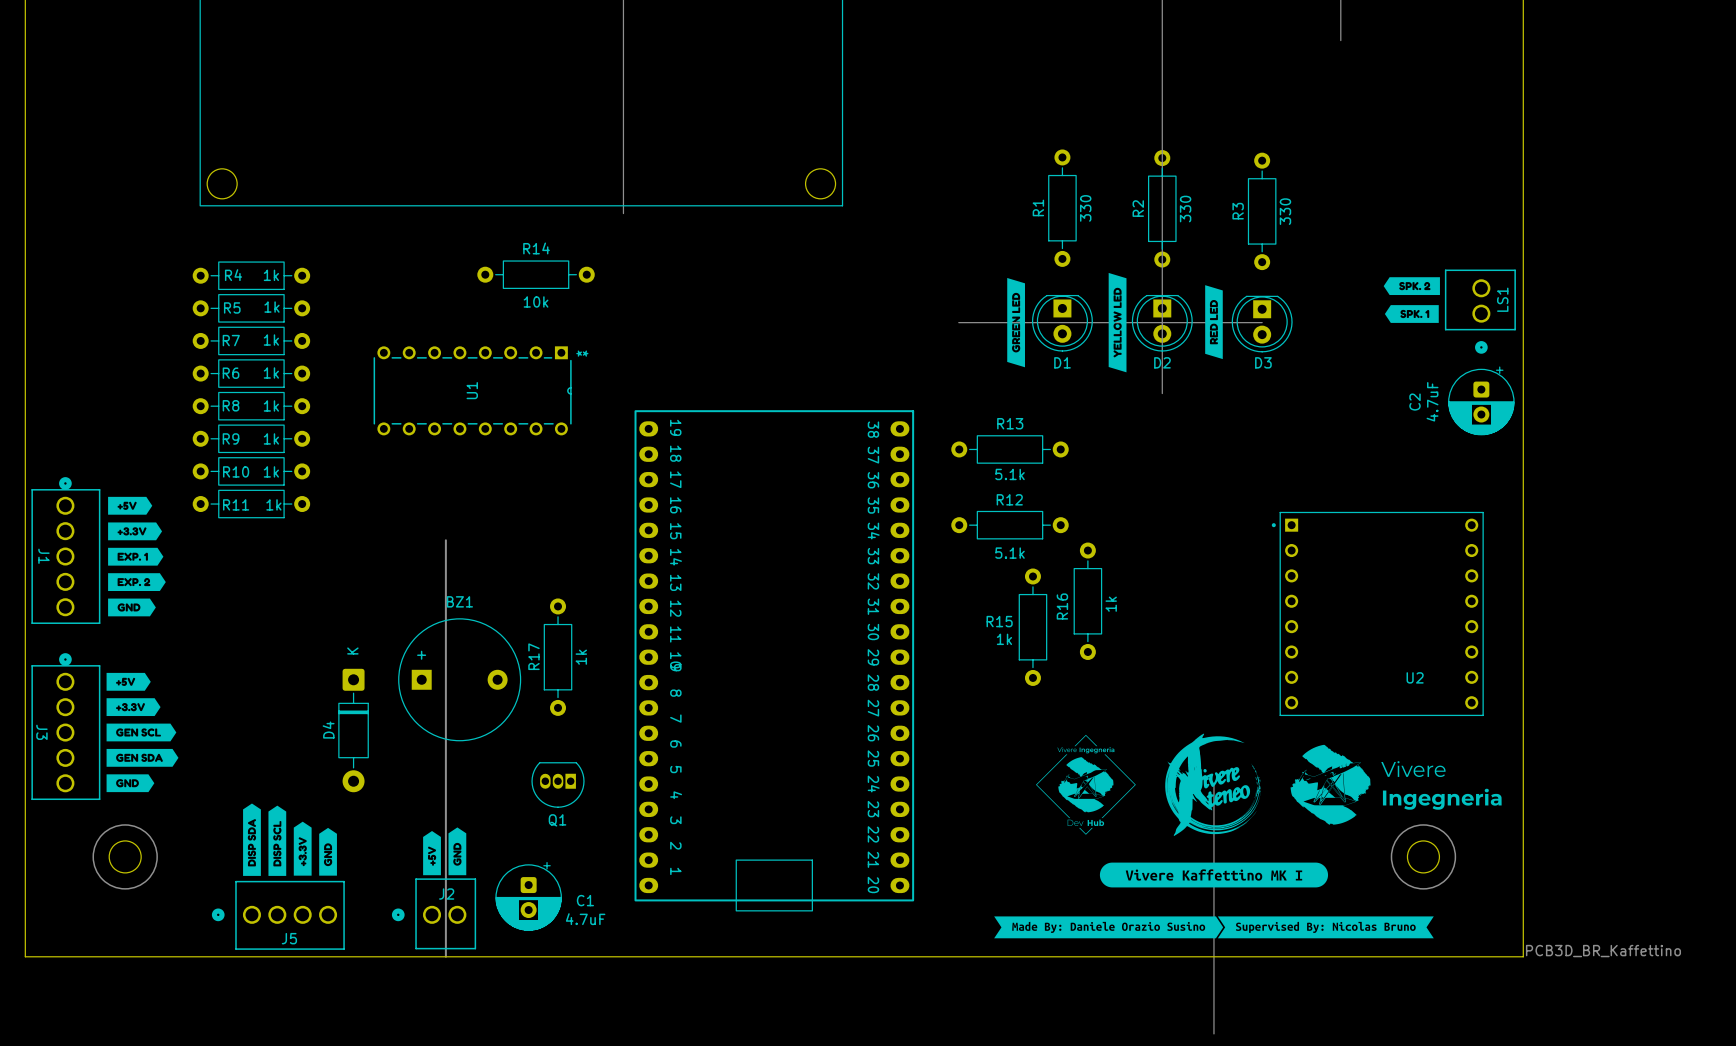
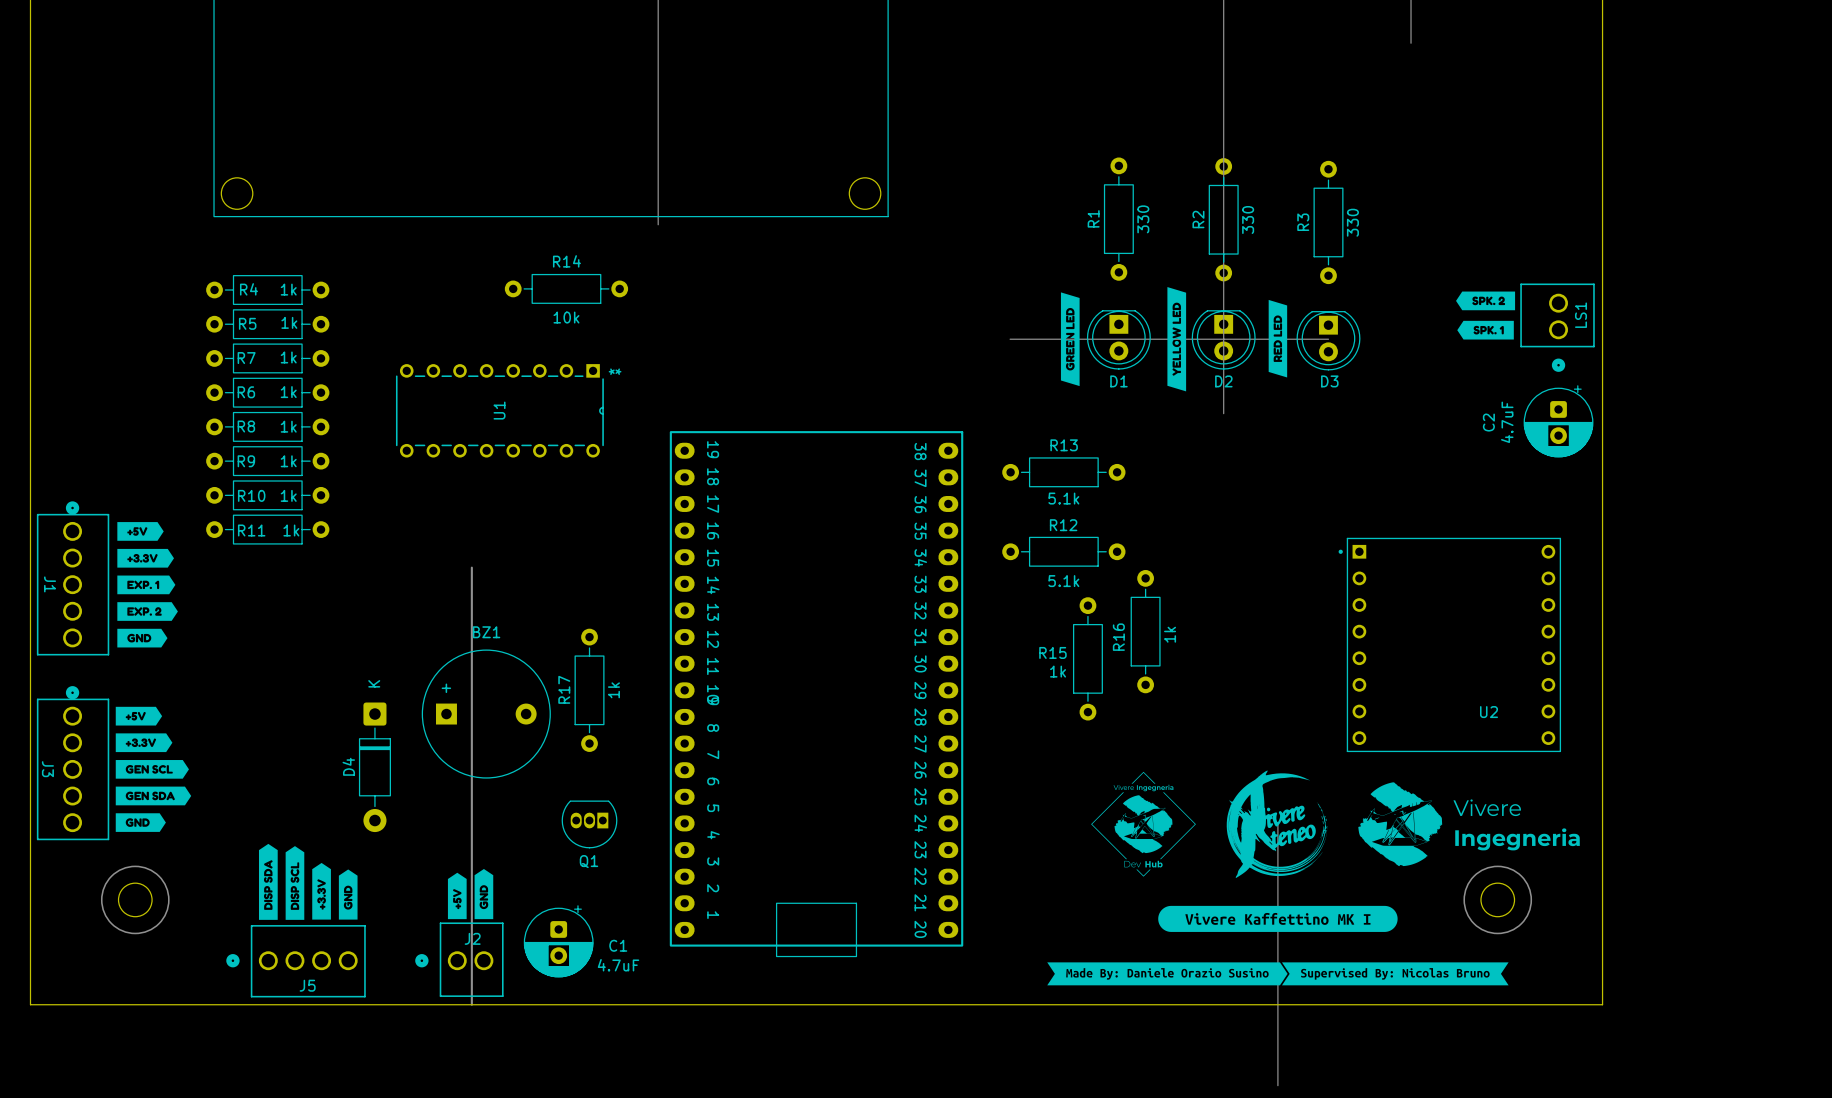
text: PCB3D_BR_Kaffettino (1603, 951) -> none

